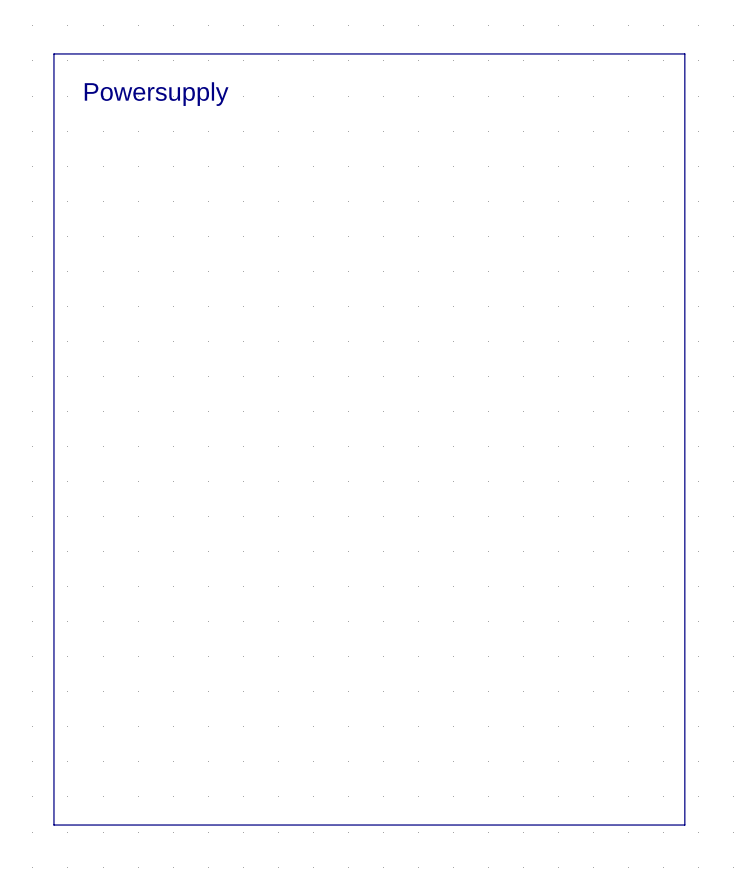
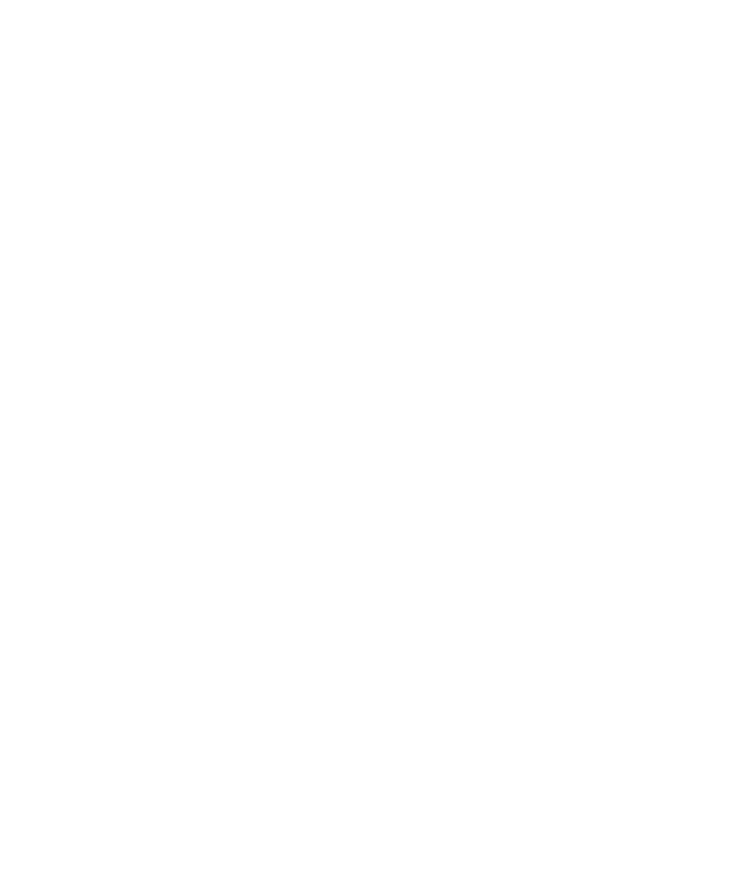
line: (53, 53) (684, 53) (684, 825) (53, 825) (53, 53) -> none
text: Powersupply (156, 94) -> none

